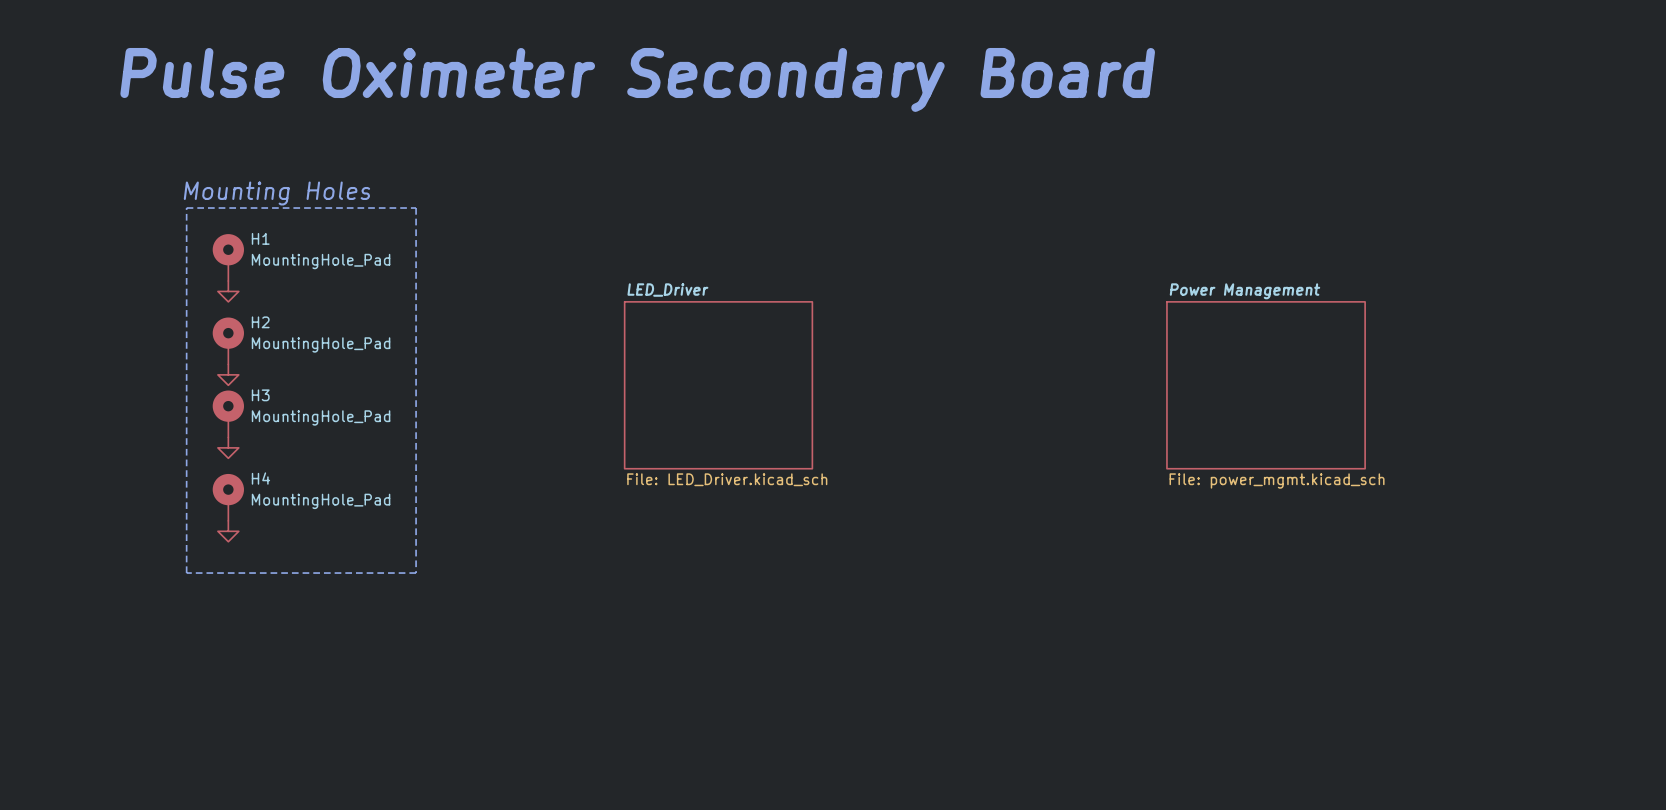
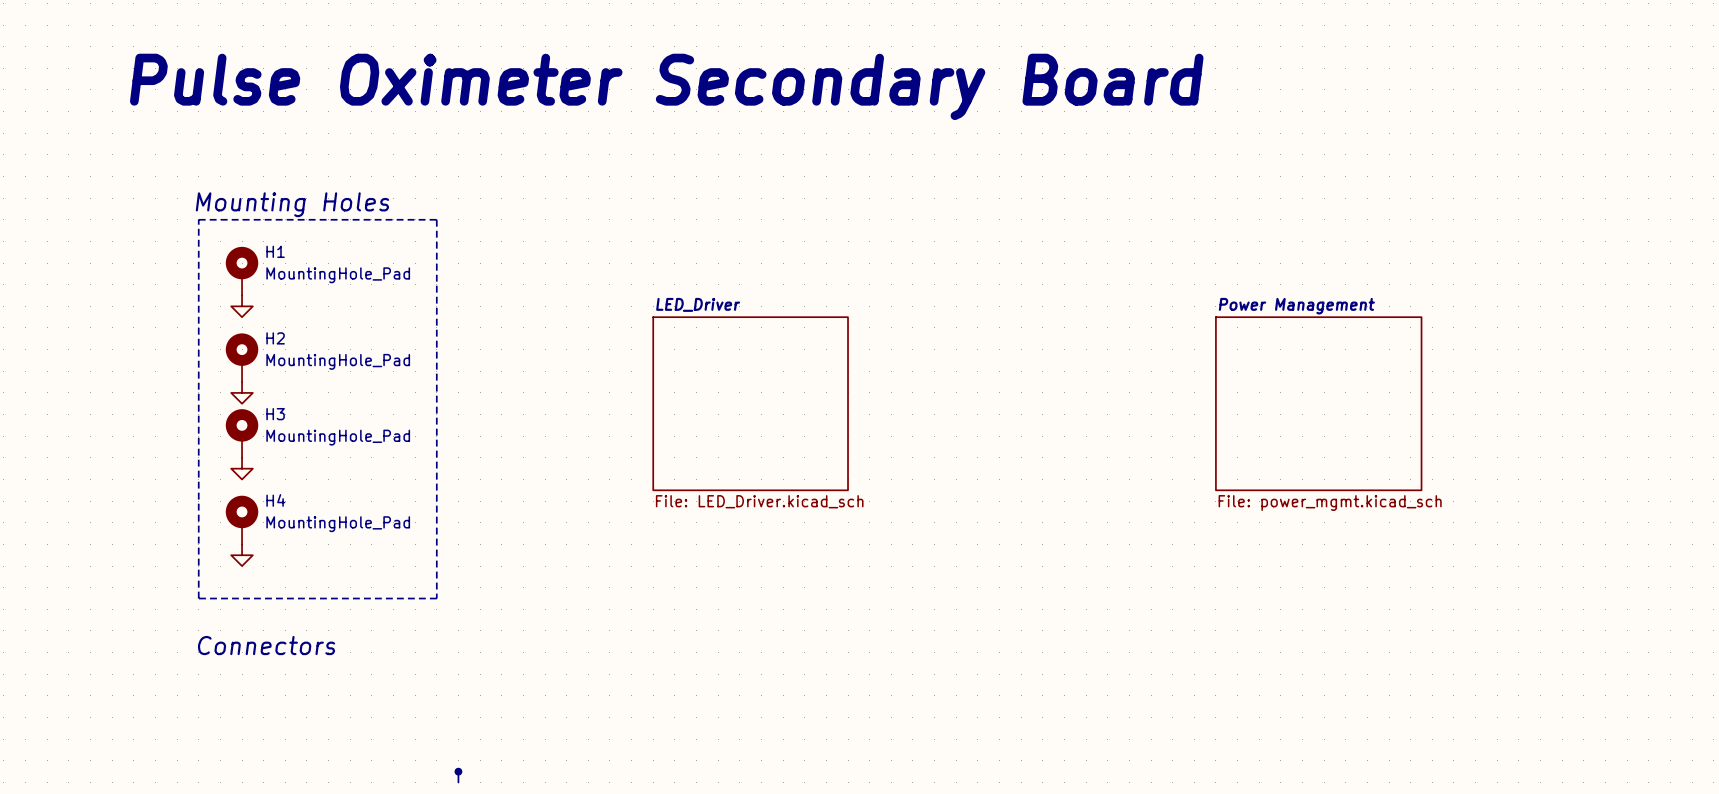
text: none -> Connectors (266, 645)
wire: none -> (458, 771) (458, 782)
junction: none -> (458, 771)

